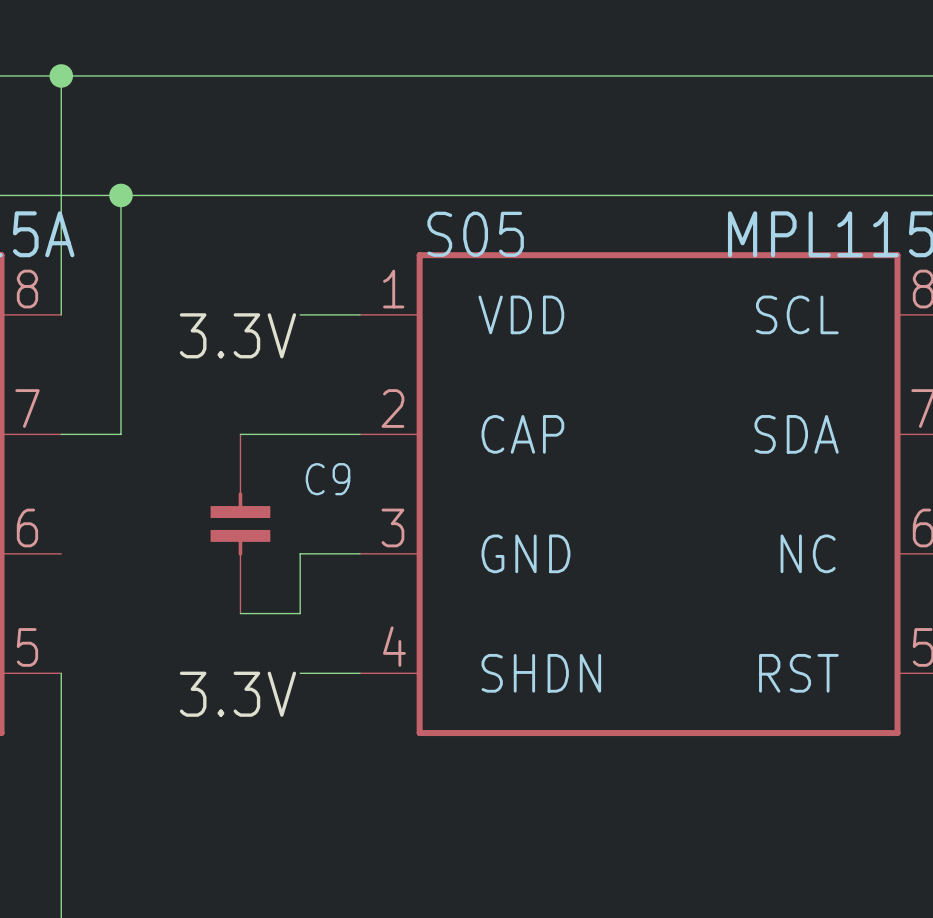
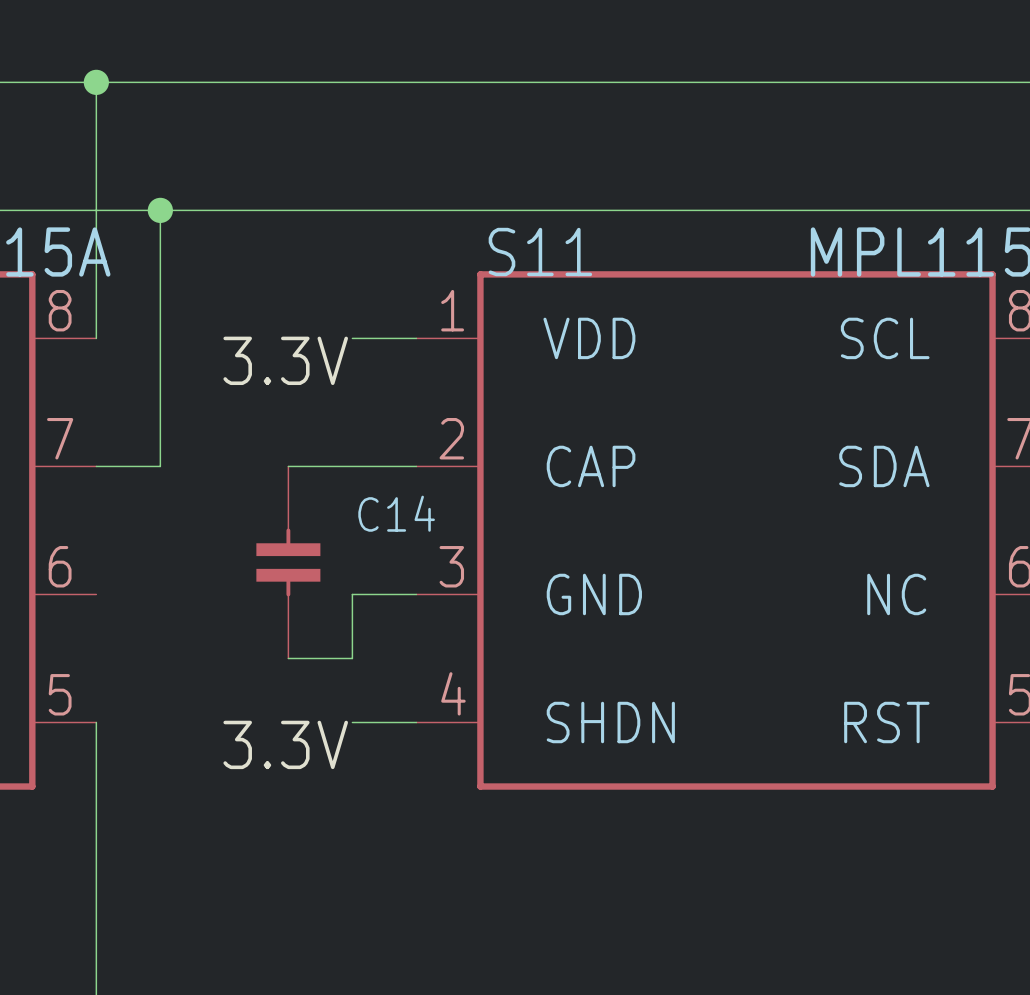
S05 name: S05 (475, 234) -> S11 (540, 252)
C9 name: C9 (328, 479) -> C14 (396, 513)

